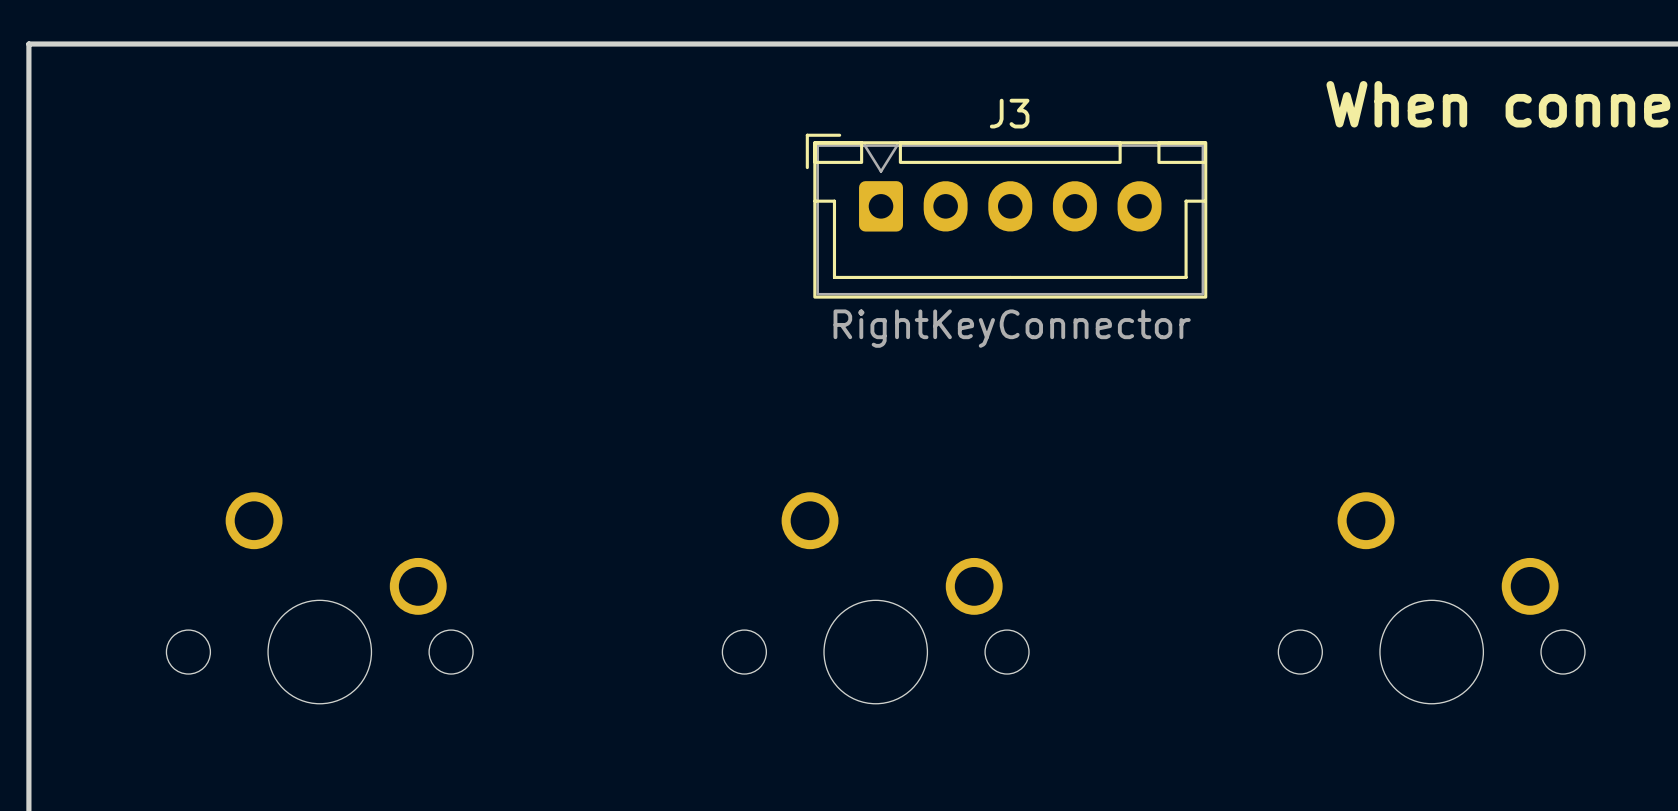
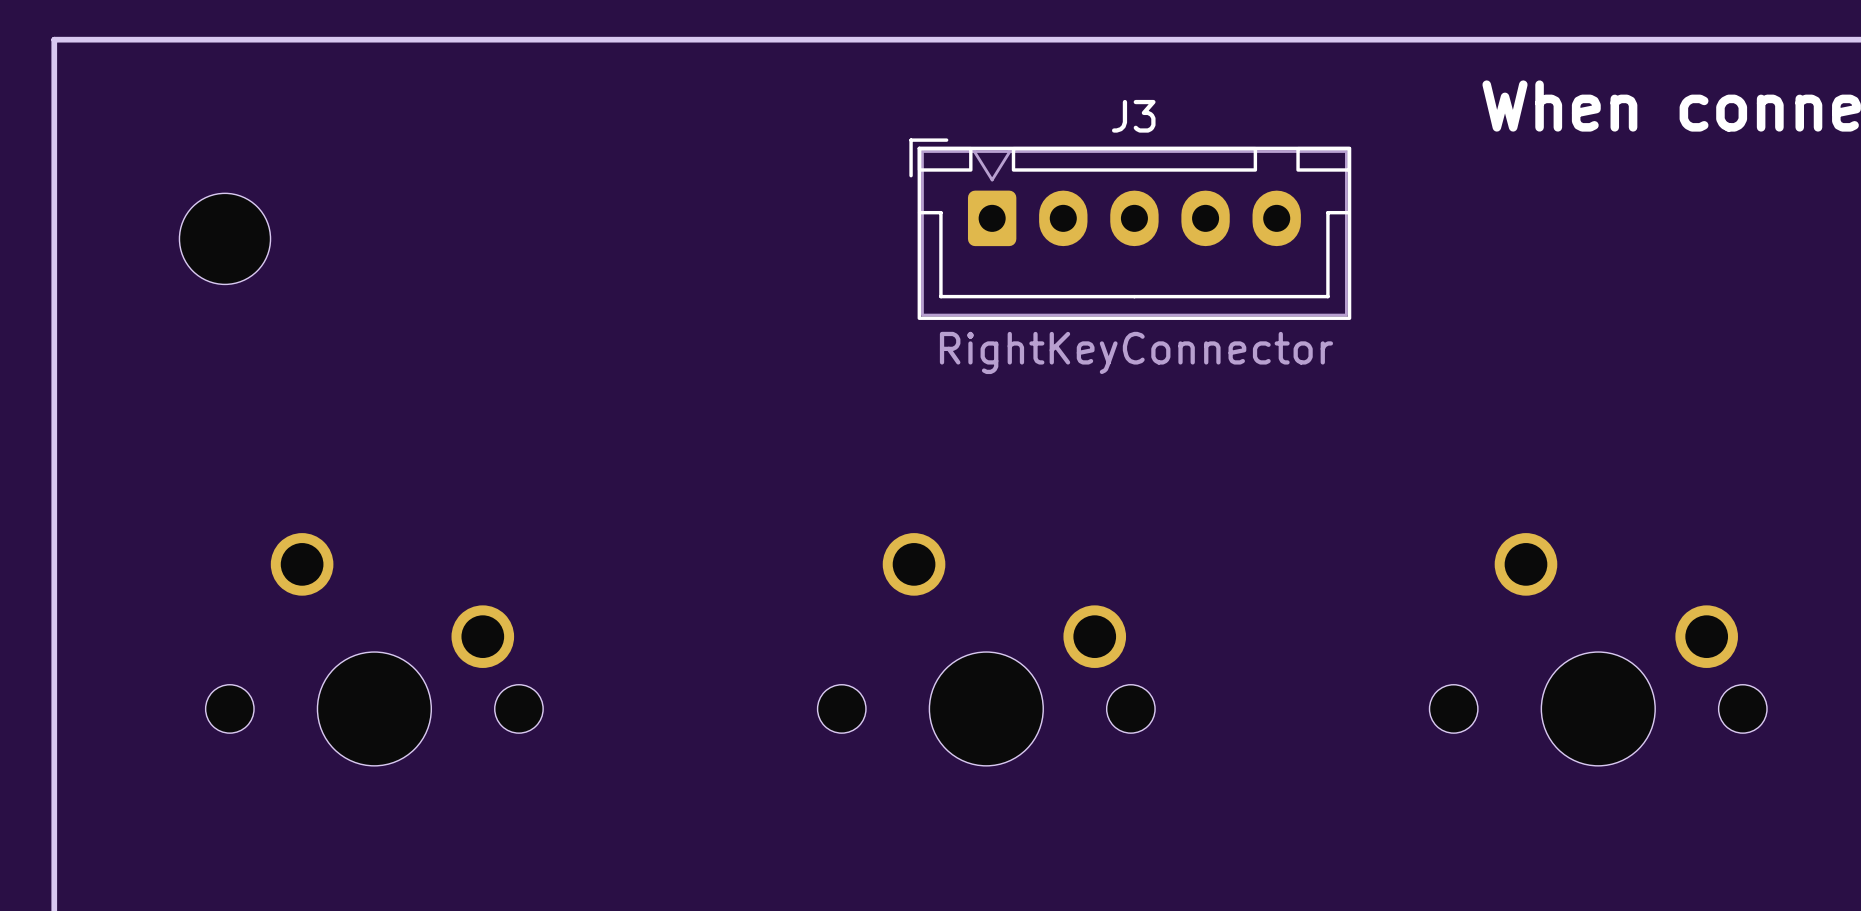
part: none -> (224, 238)

